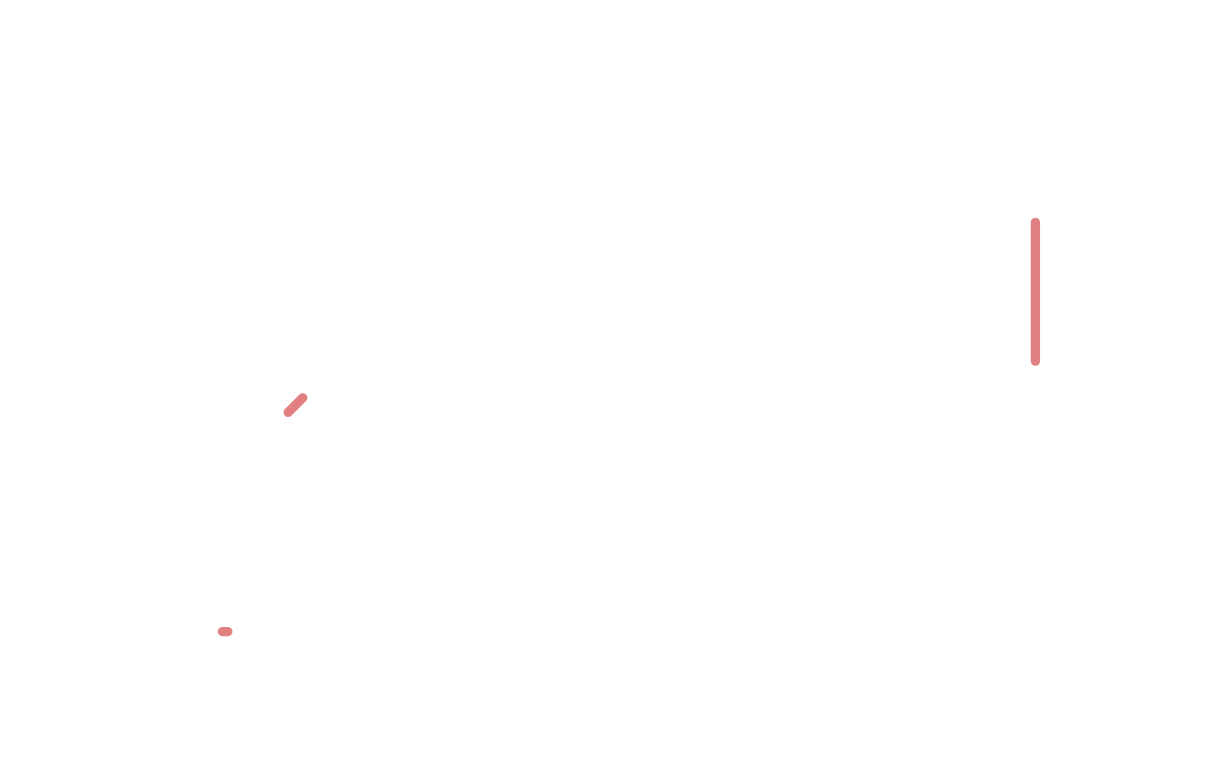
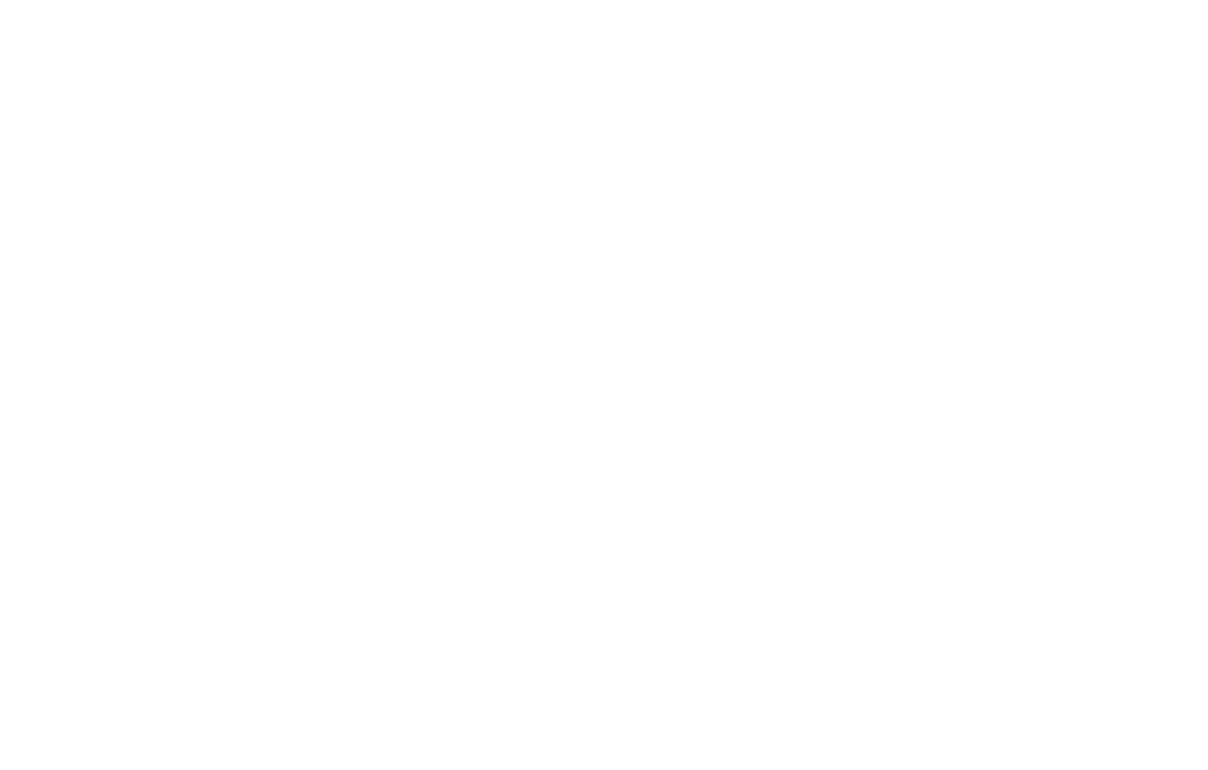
track: (1035, 222) (1035, 361) -> none
track: (302, 397) (288, 412) -> none
track: (222, 631) (227, 631) -> none

